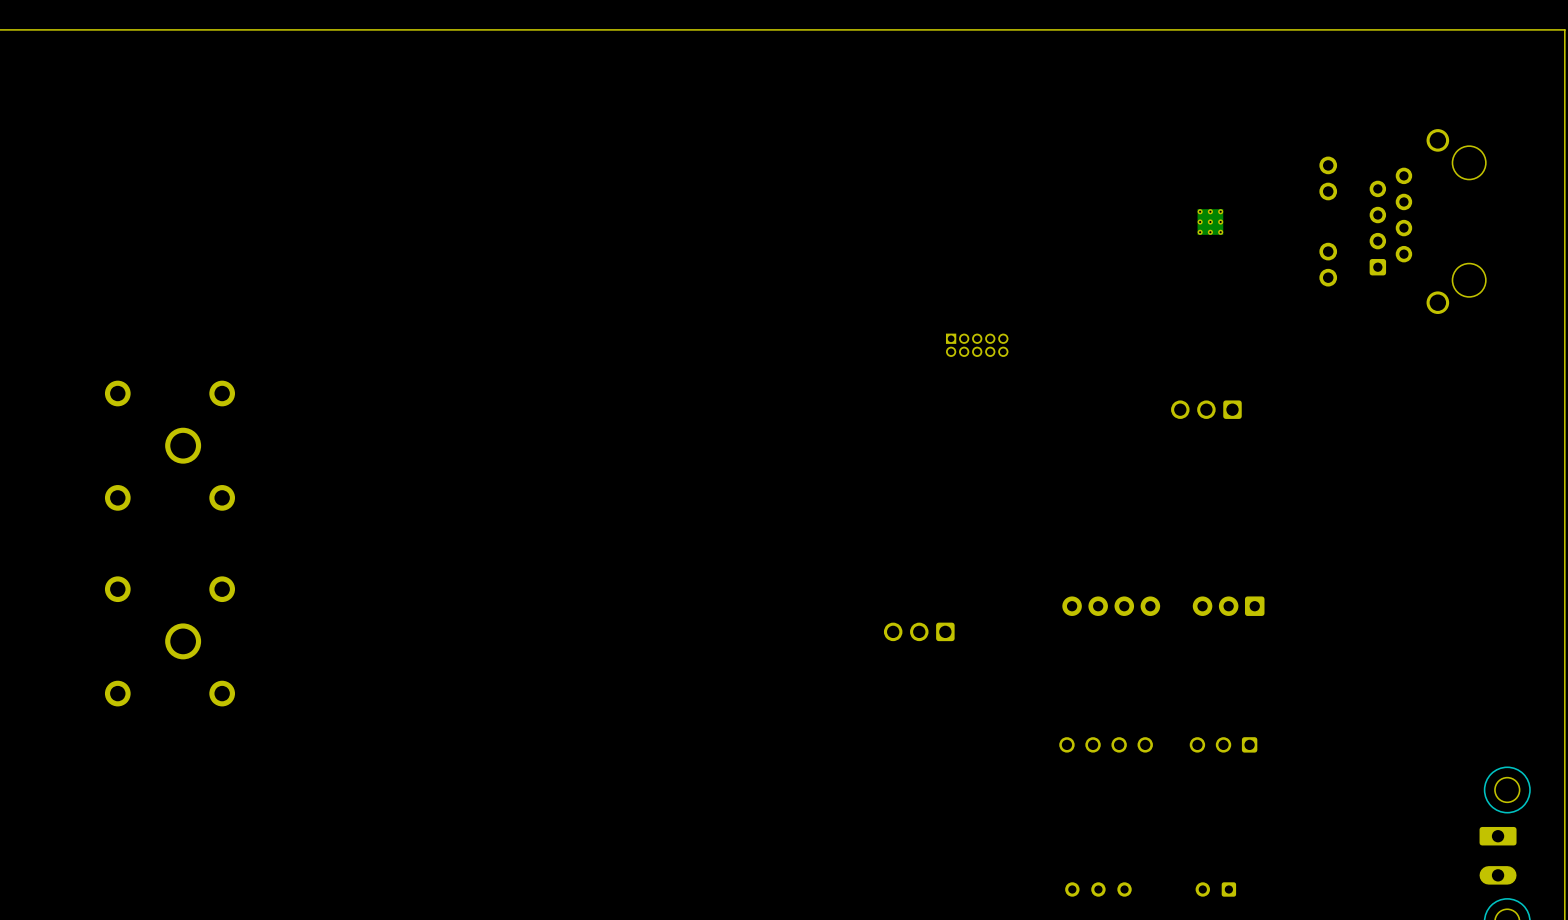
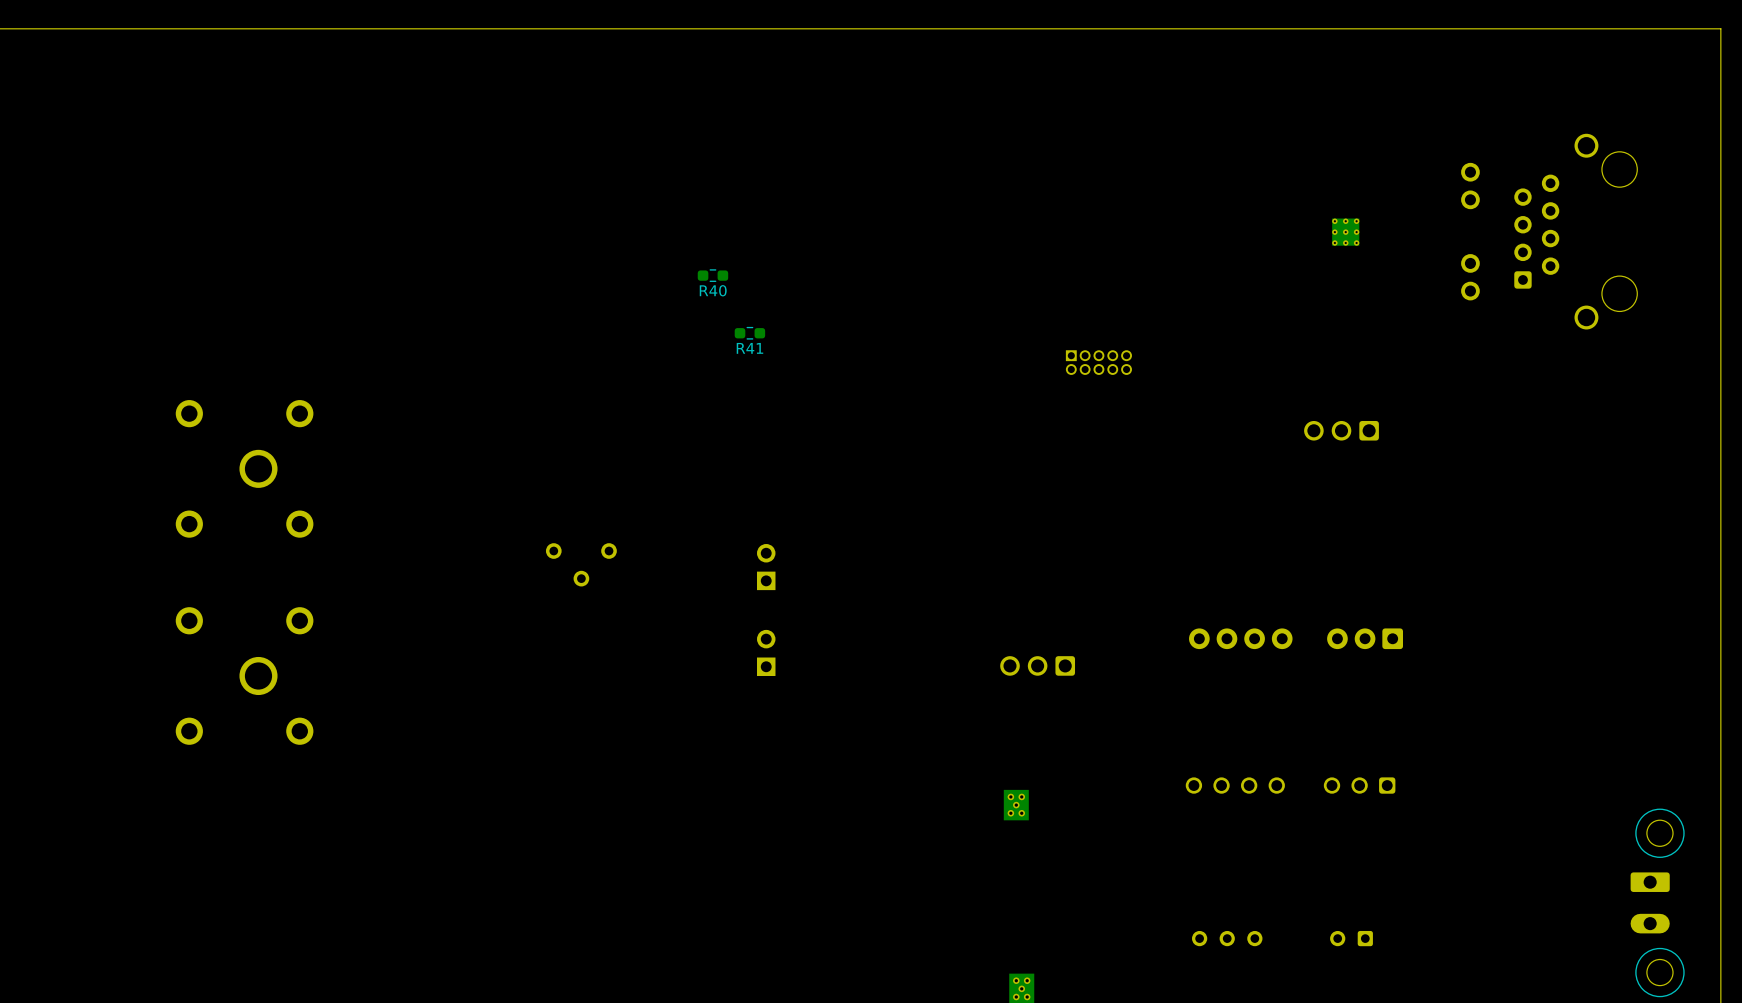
R40: none -> (712, 275)
R41: none -> (749, 333)
part: none -> (581, 564)
part: none -> (766, 567)
part: none -> (766, 652)
part: none -> (1016, 805)

